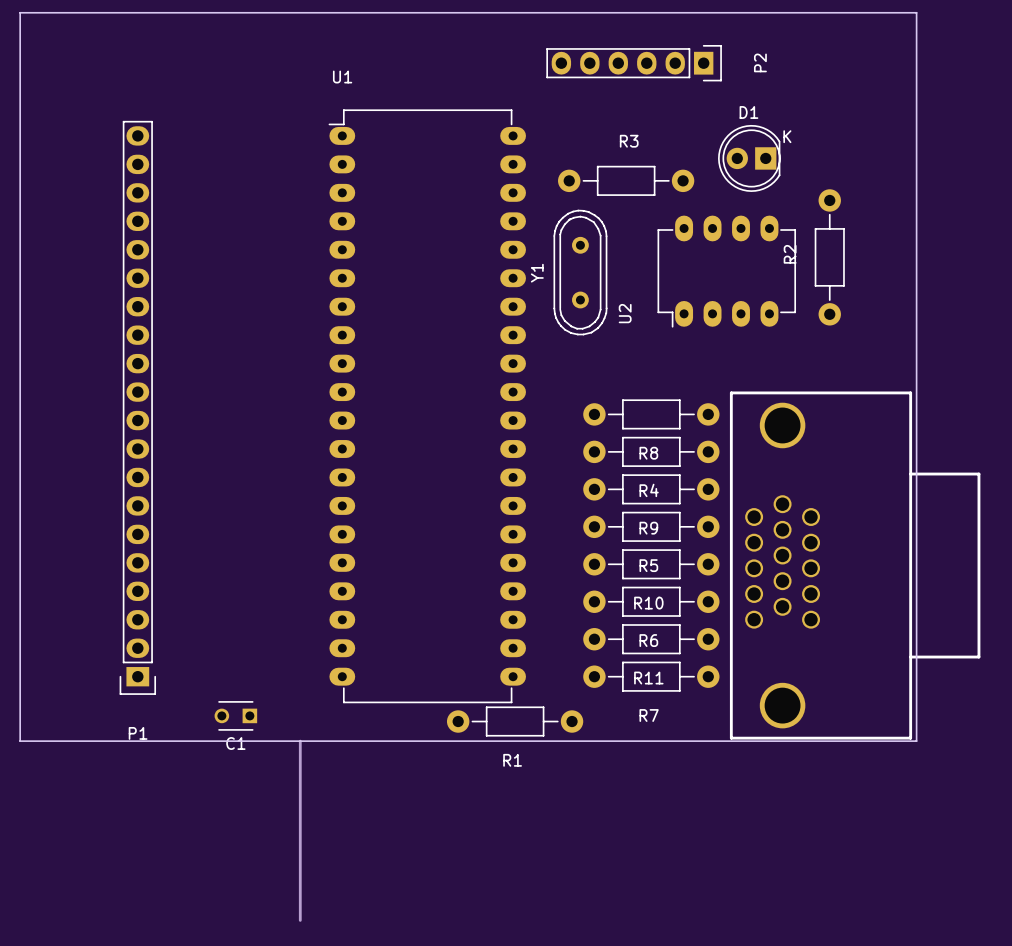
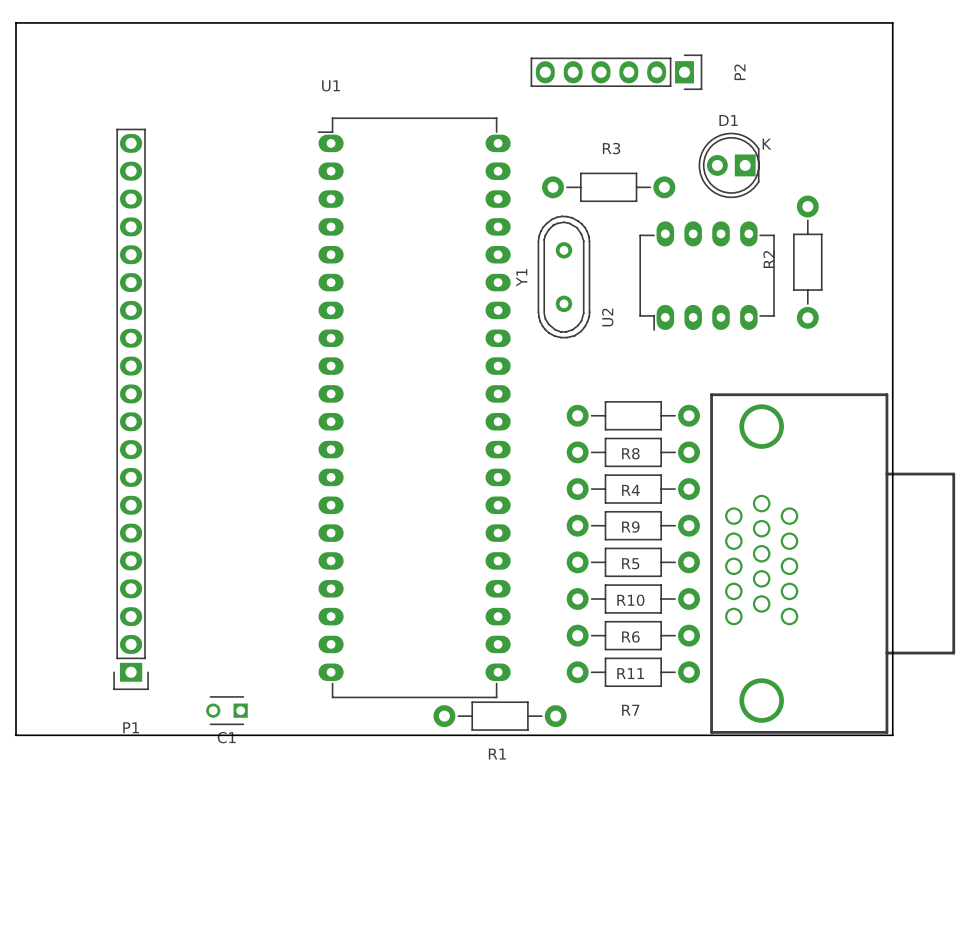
line: (300, 741) (300, 920) -> none

